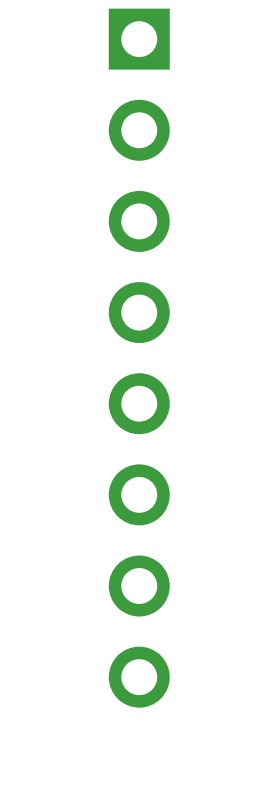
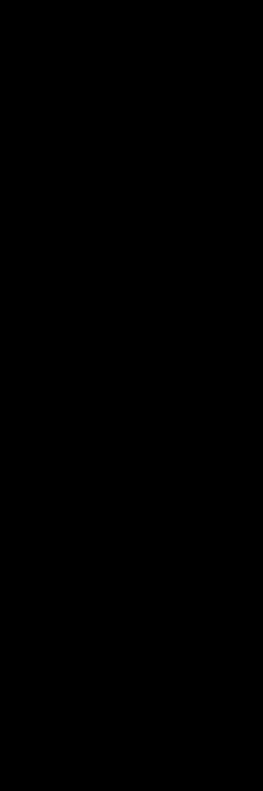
part: (139, 358) -> none

